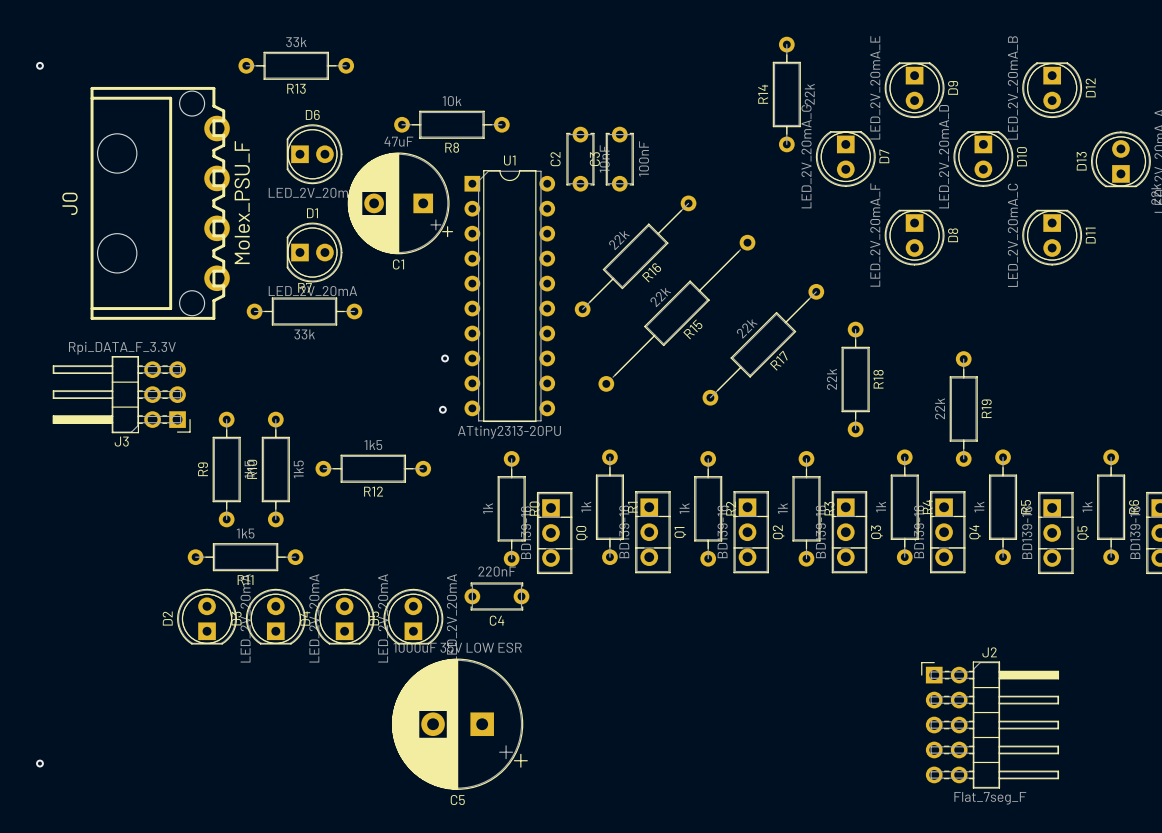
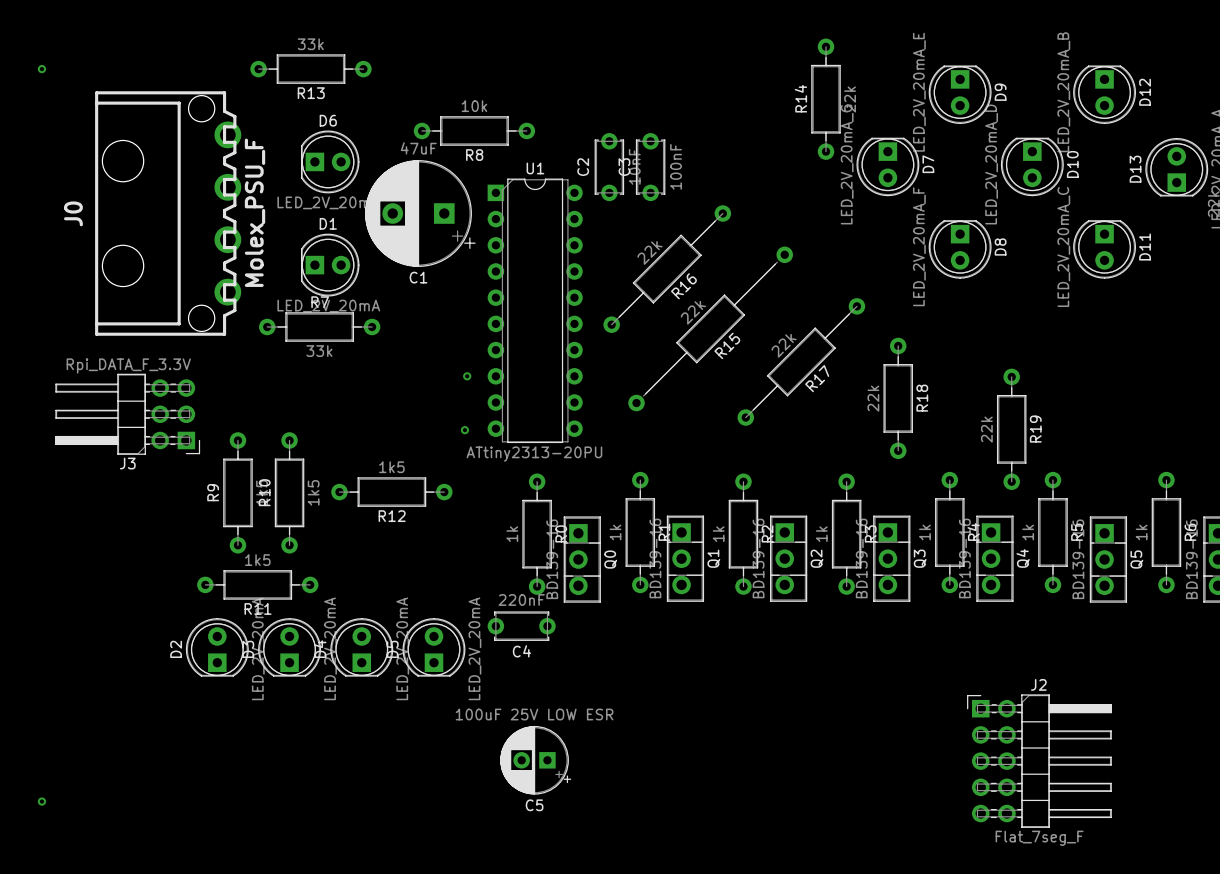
C5 value: 1000uF 35V LOW ESR (457, 647) -> 100uF 25V LOW ESR (534, 714)
C5 footprint: [391, 658, 528, 790] -> [500, 725, 572, 795]
C5 name position: C5 (457, 800) -> C5 (534, 805)

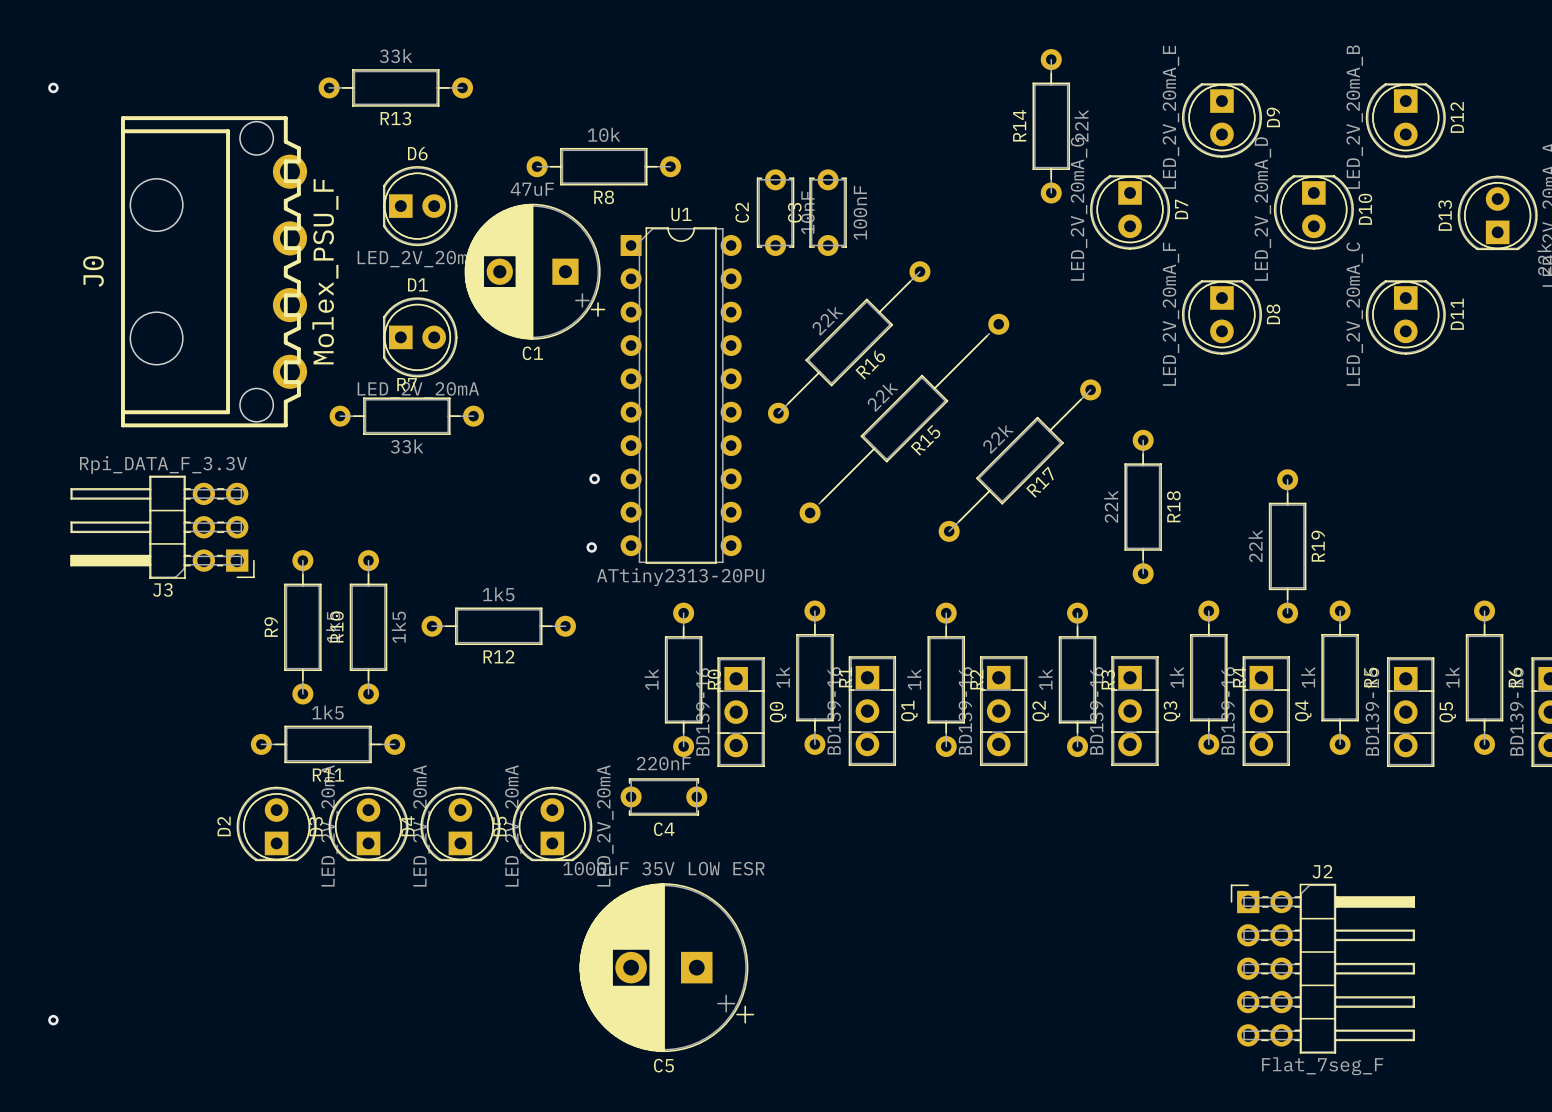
C5 value: 100uF 25V LOW ESR (534, 714) -> 1000uF 35V LOW ESR (663, 868)
C5 footprint: [500, 725, 572, 795] -> [579, 883, 755, 1053]
C5 name position: C5 (534, 805) -> C5 (663, 1065)

